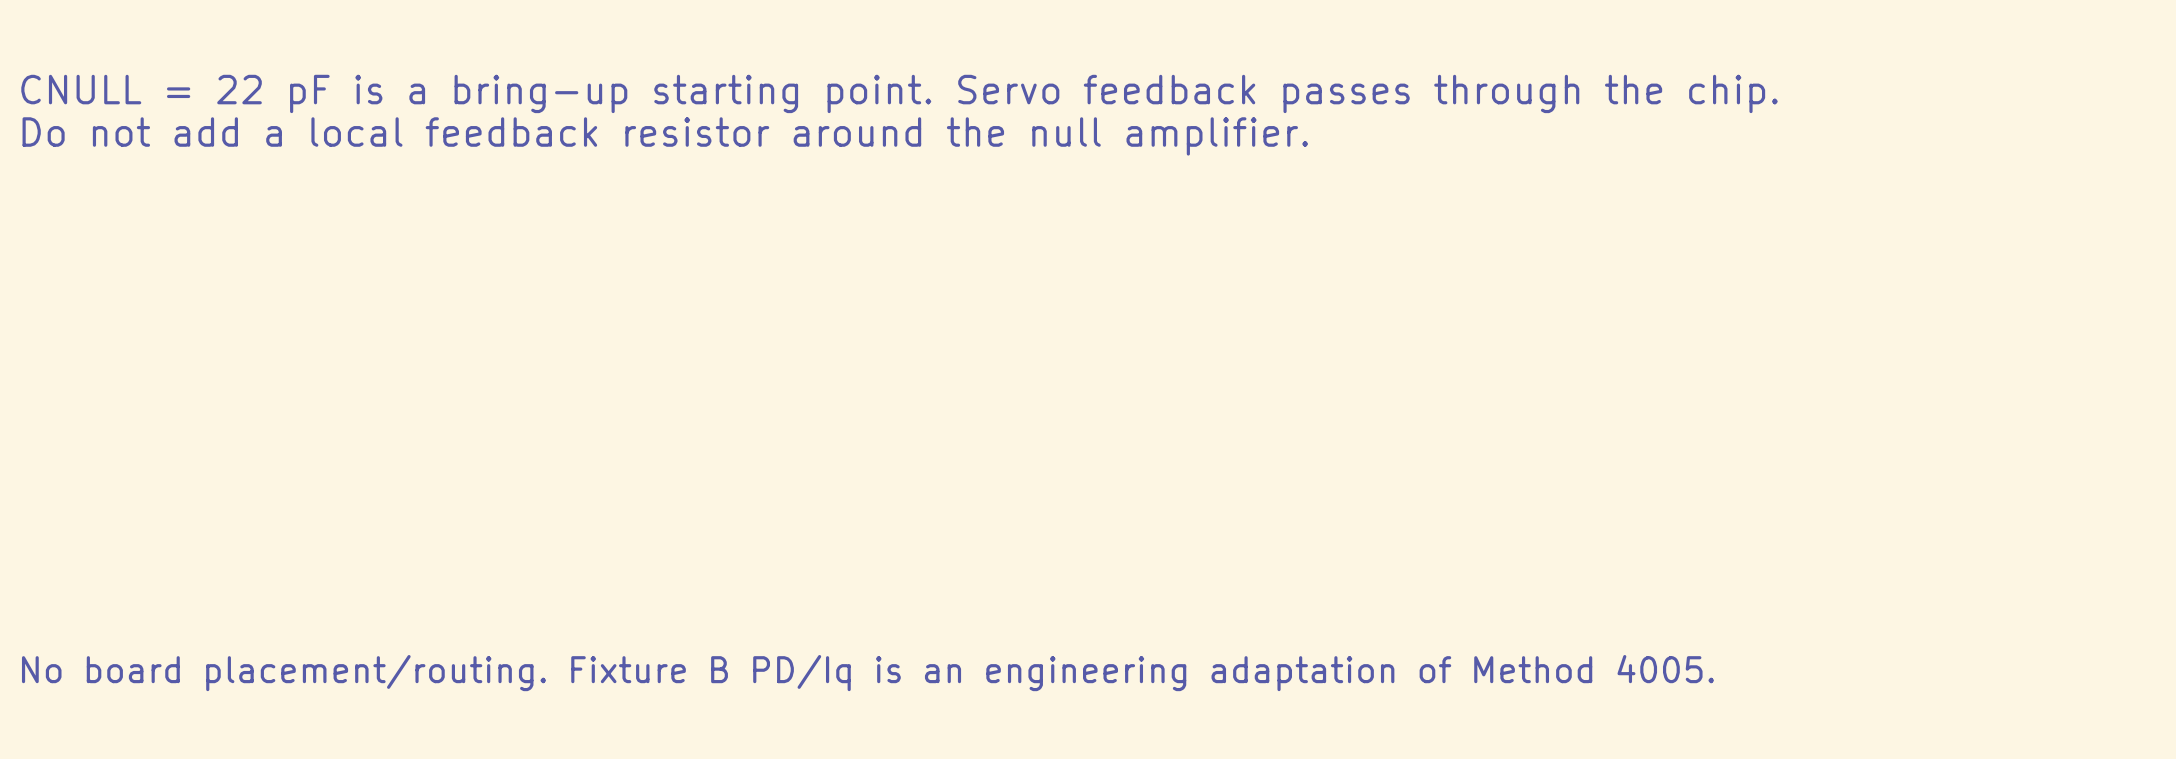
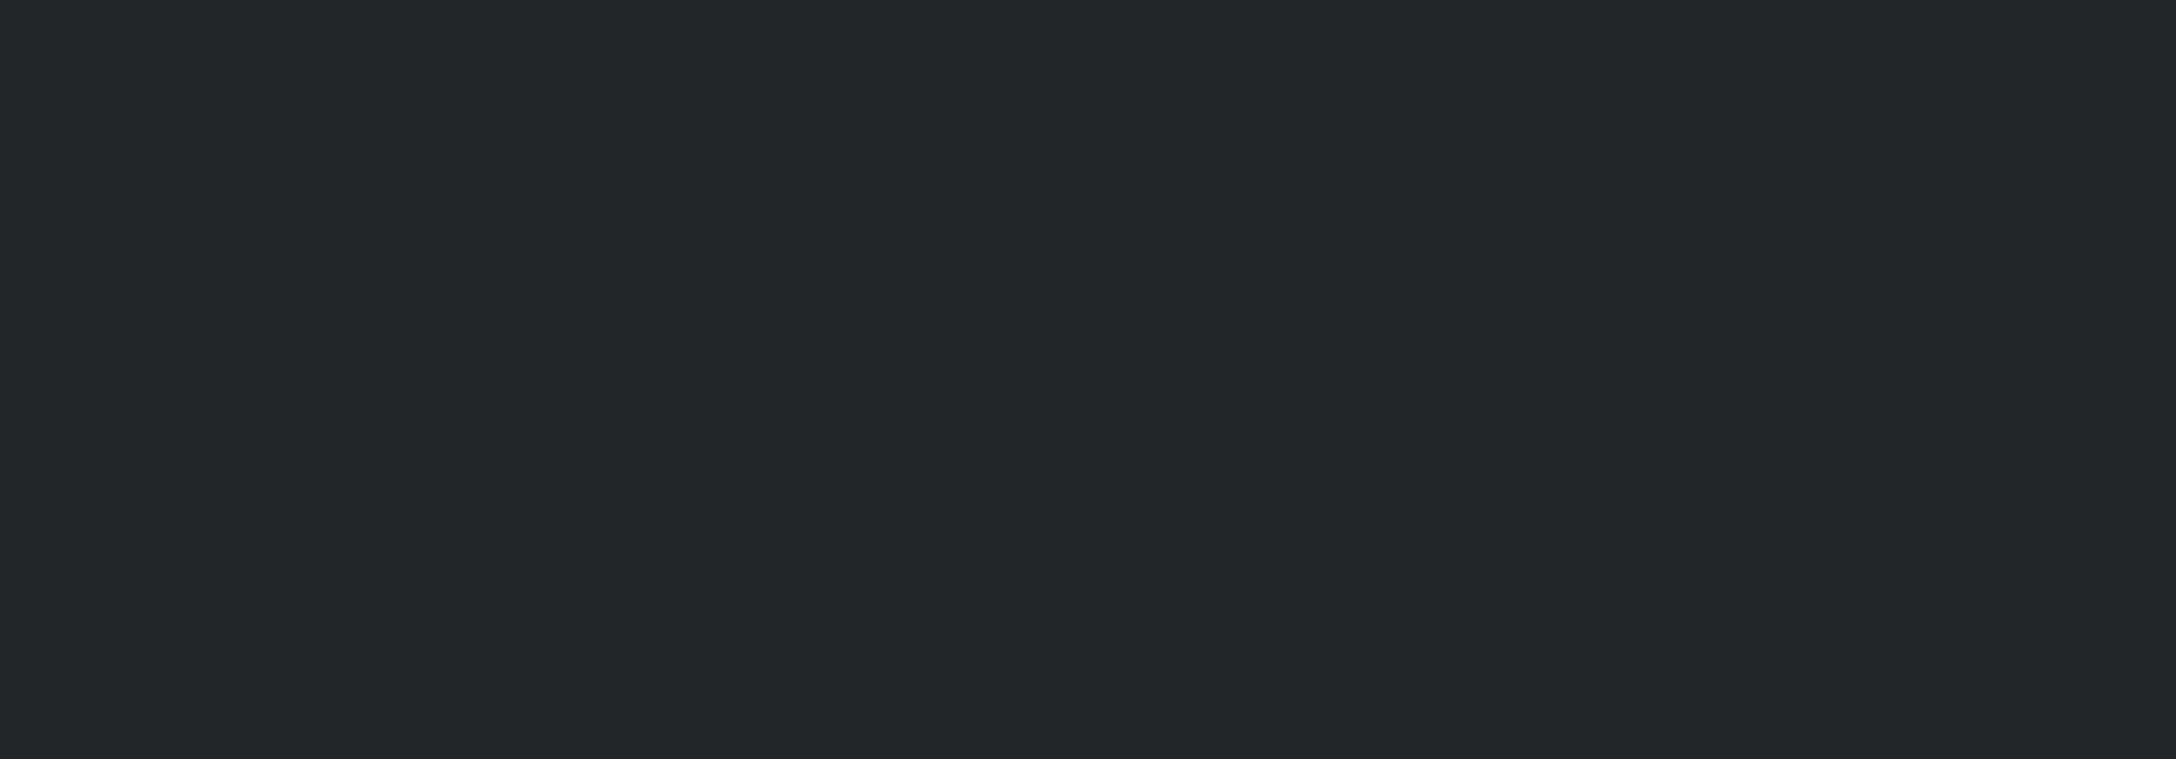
text: CNULL = 22 pF is a bring-up starting point. Servo feedback passes through the chip. (899, 93) -> none
text: Do not add a local feedback resistor around the null amplifier. (665, 136) -> none
text: No board placement/routing. Fixture B PD/Iq is an engineering adaptation of Method 4005. (867, 673) -> none

